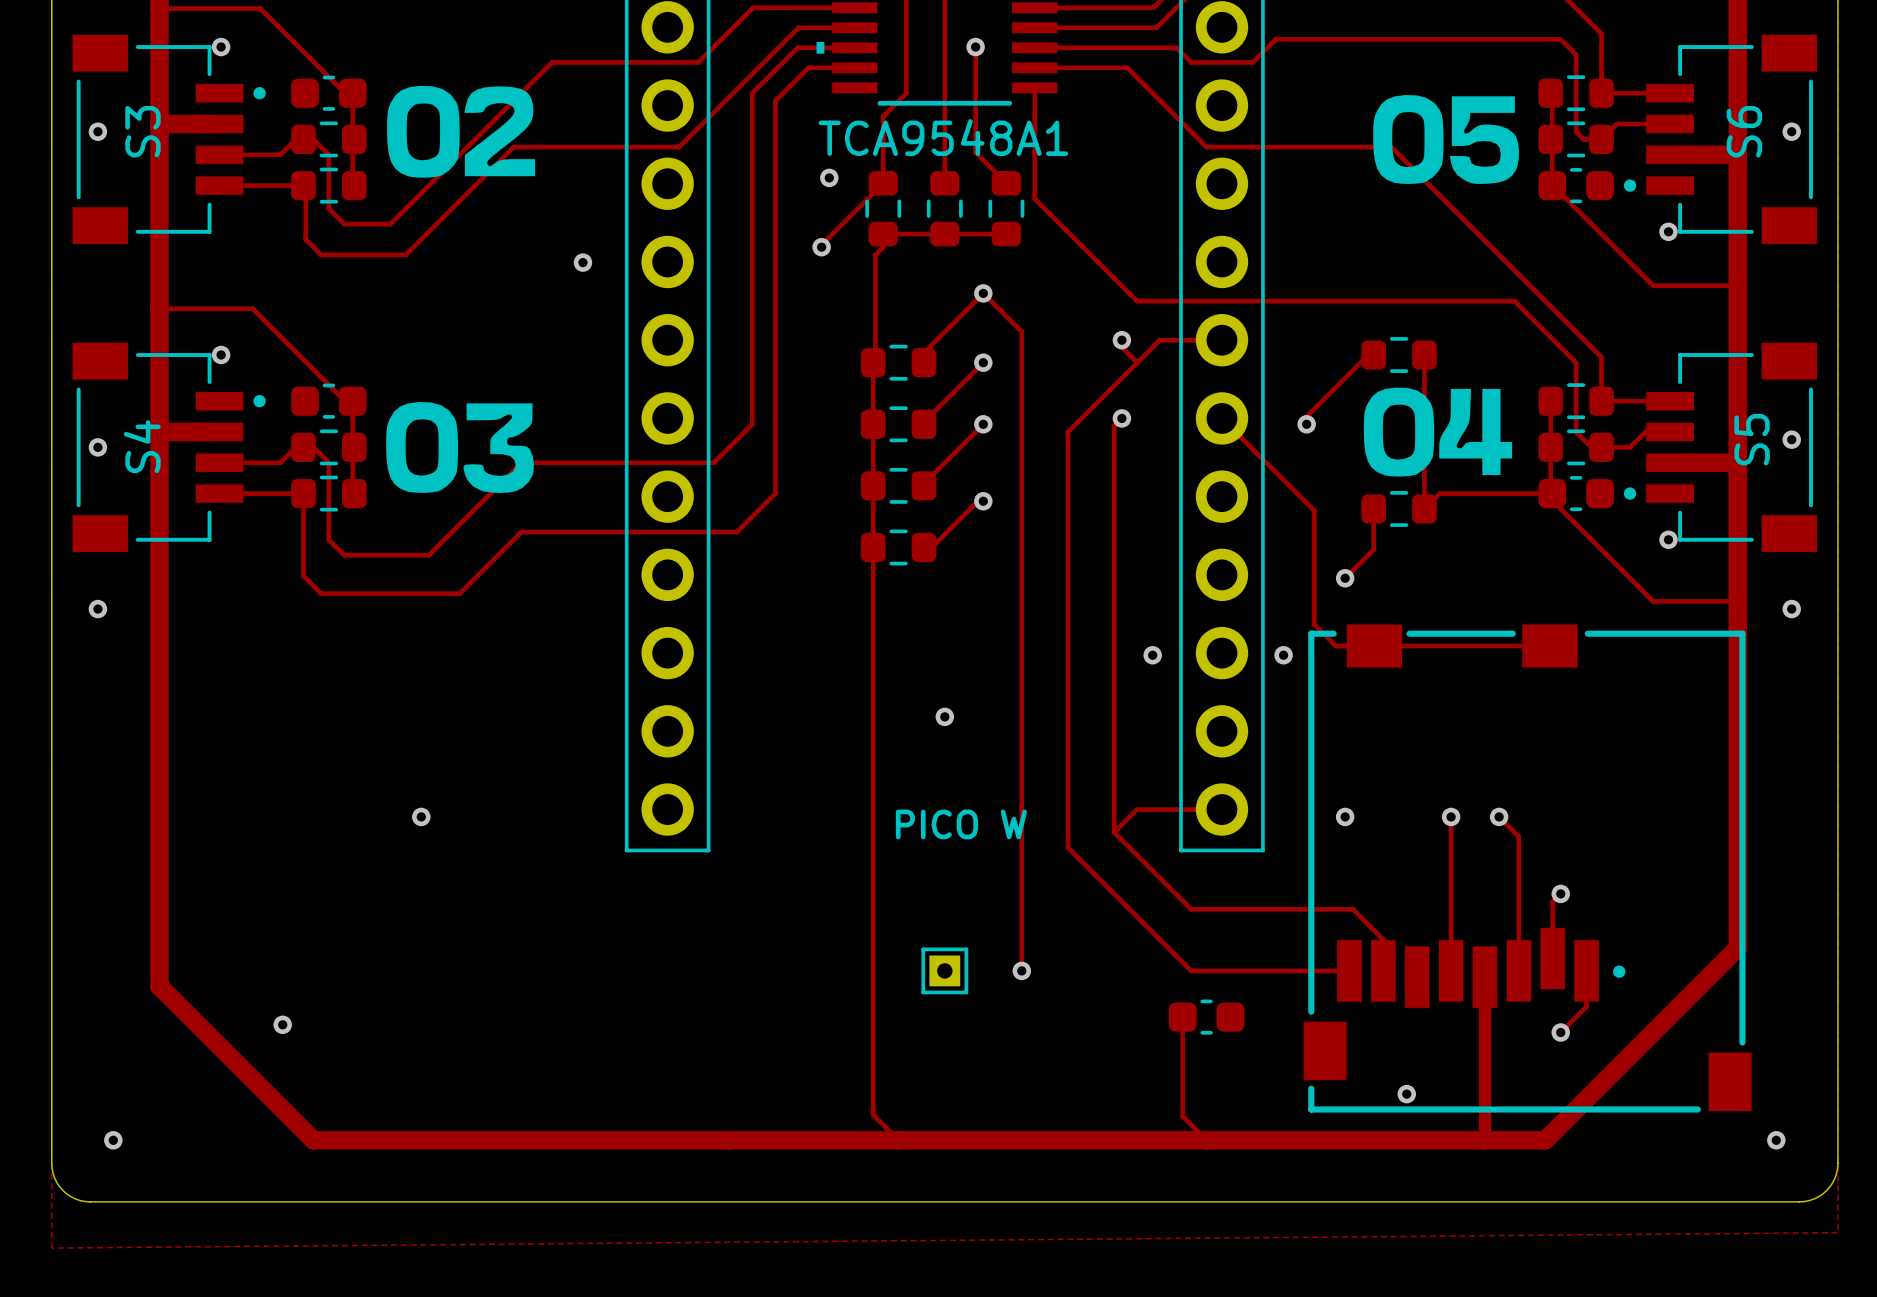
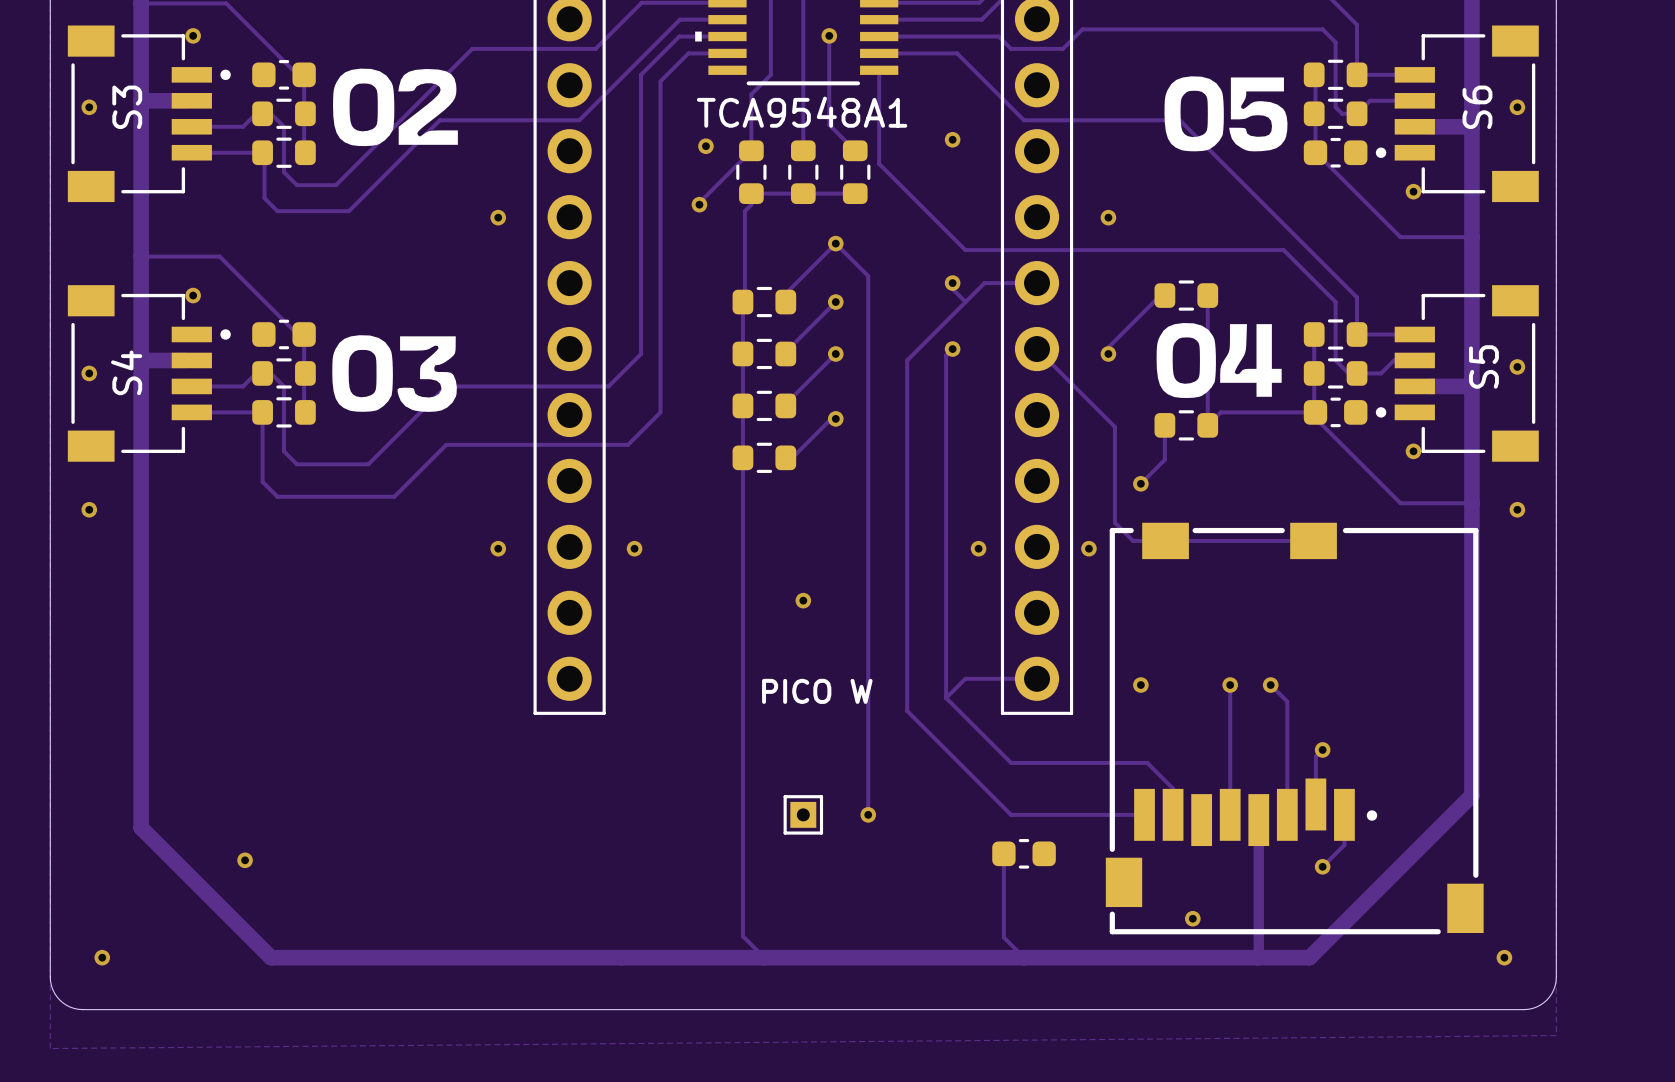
via: none -> (952, 139)
via: none -> (1108, 217)
via: none -> (498, 548)
via: none -> (634, 548)
via: (421, 816) -> none

